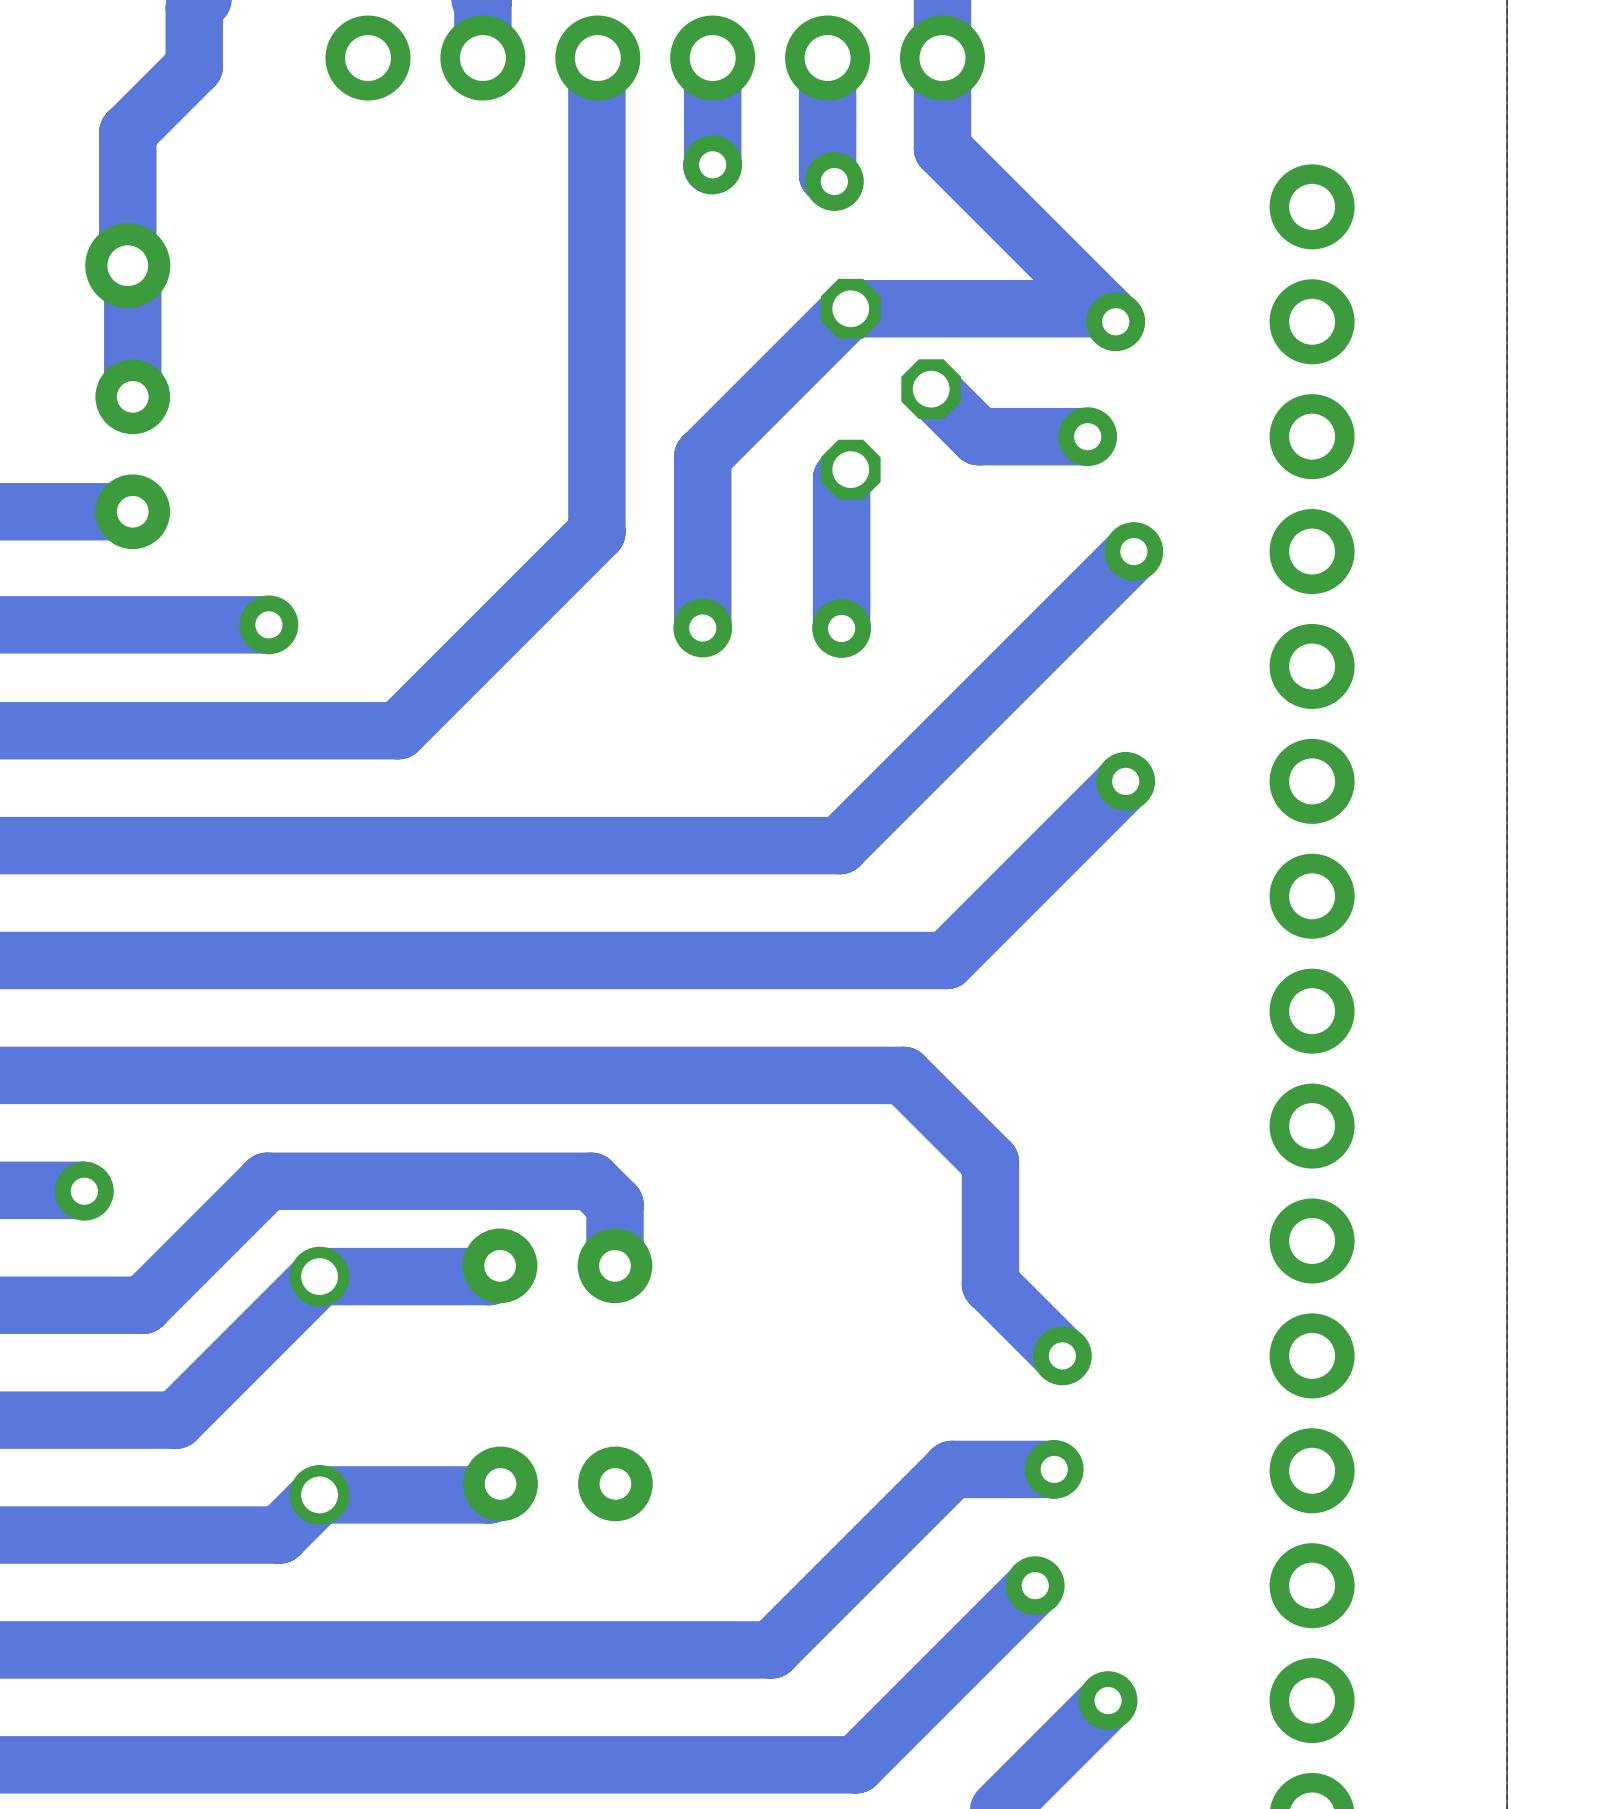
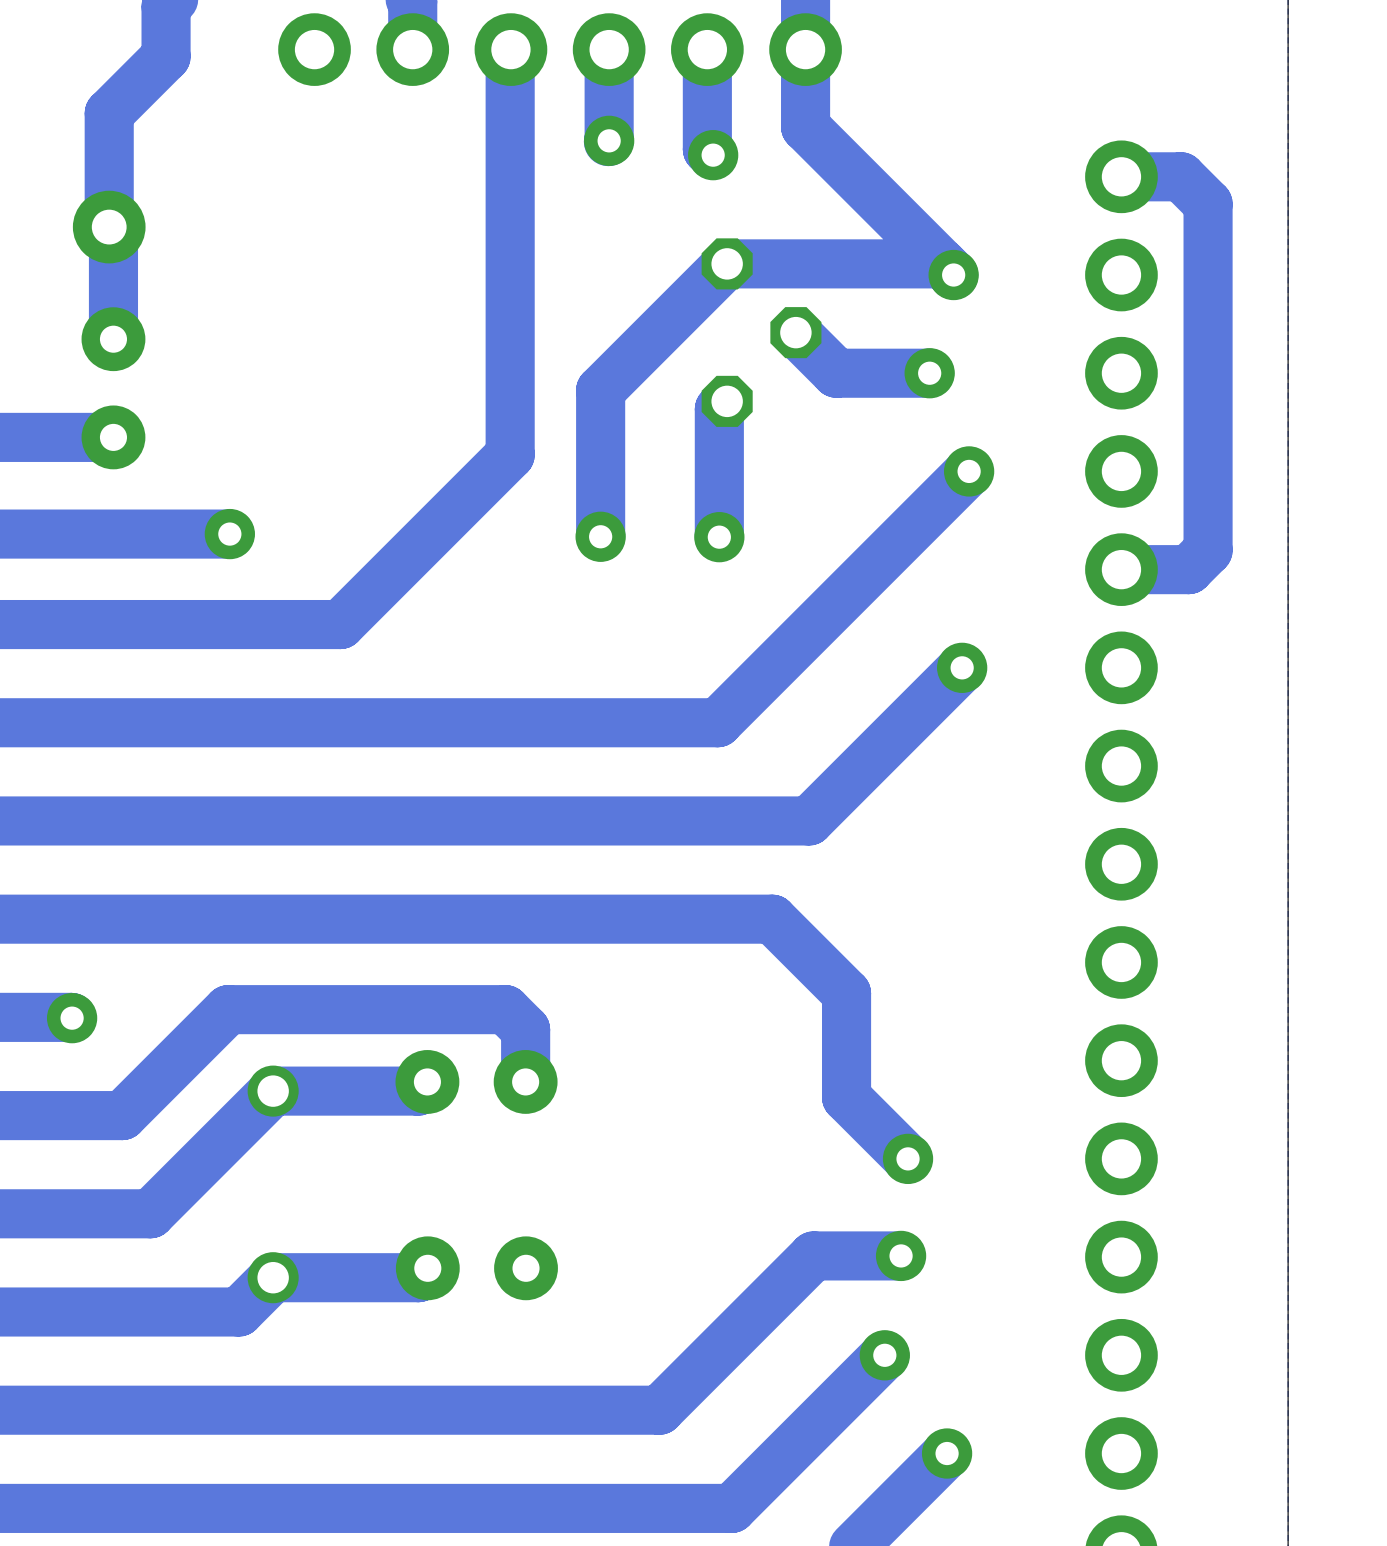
track: none -> (1121, 176) (1181, 176) (1208, 203) (1208, 550) (1188, 569) (1121, 569)

